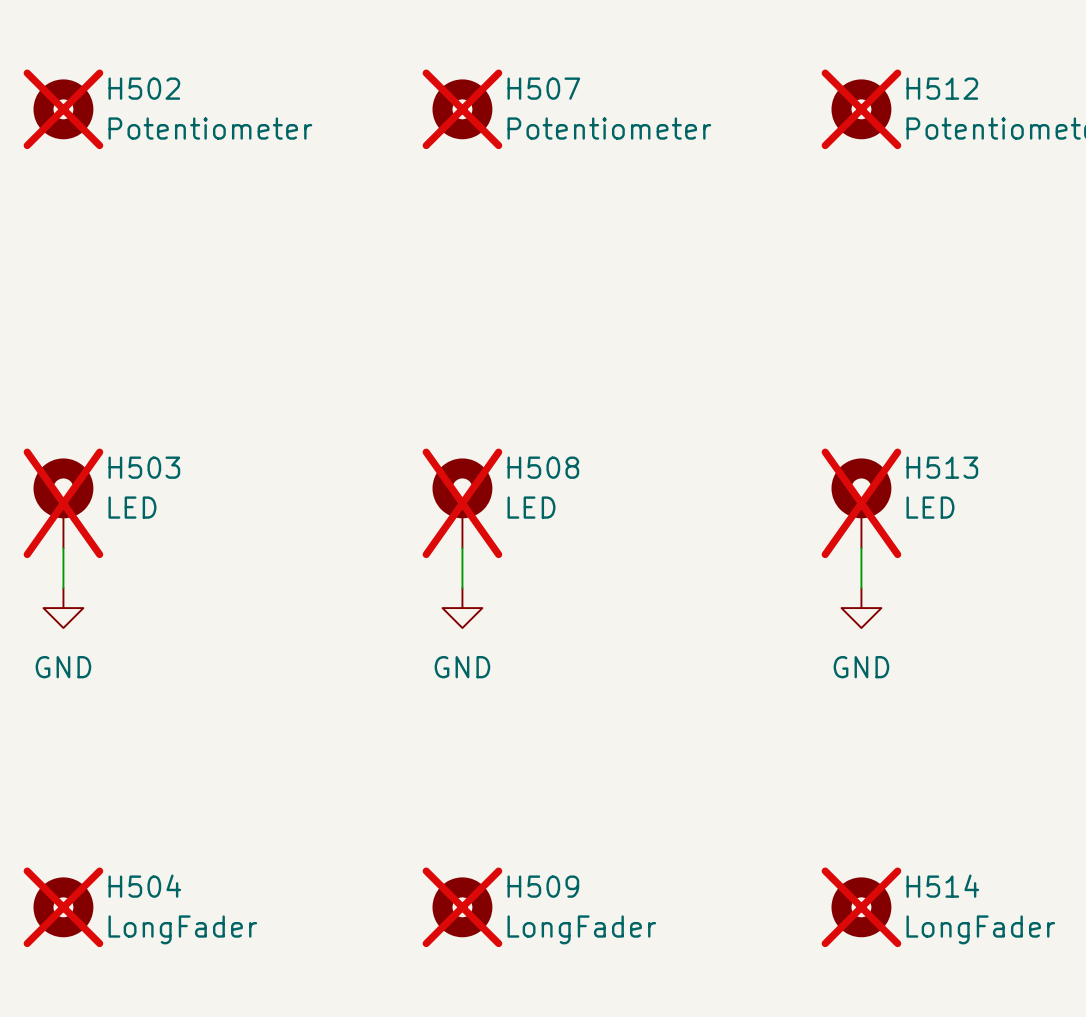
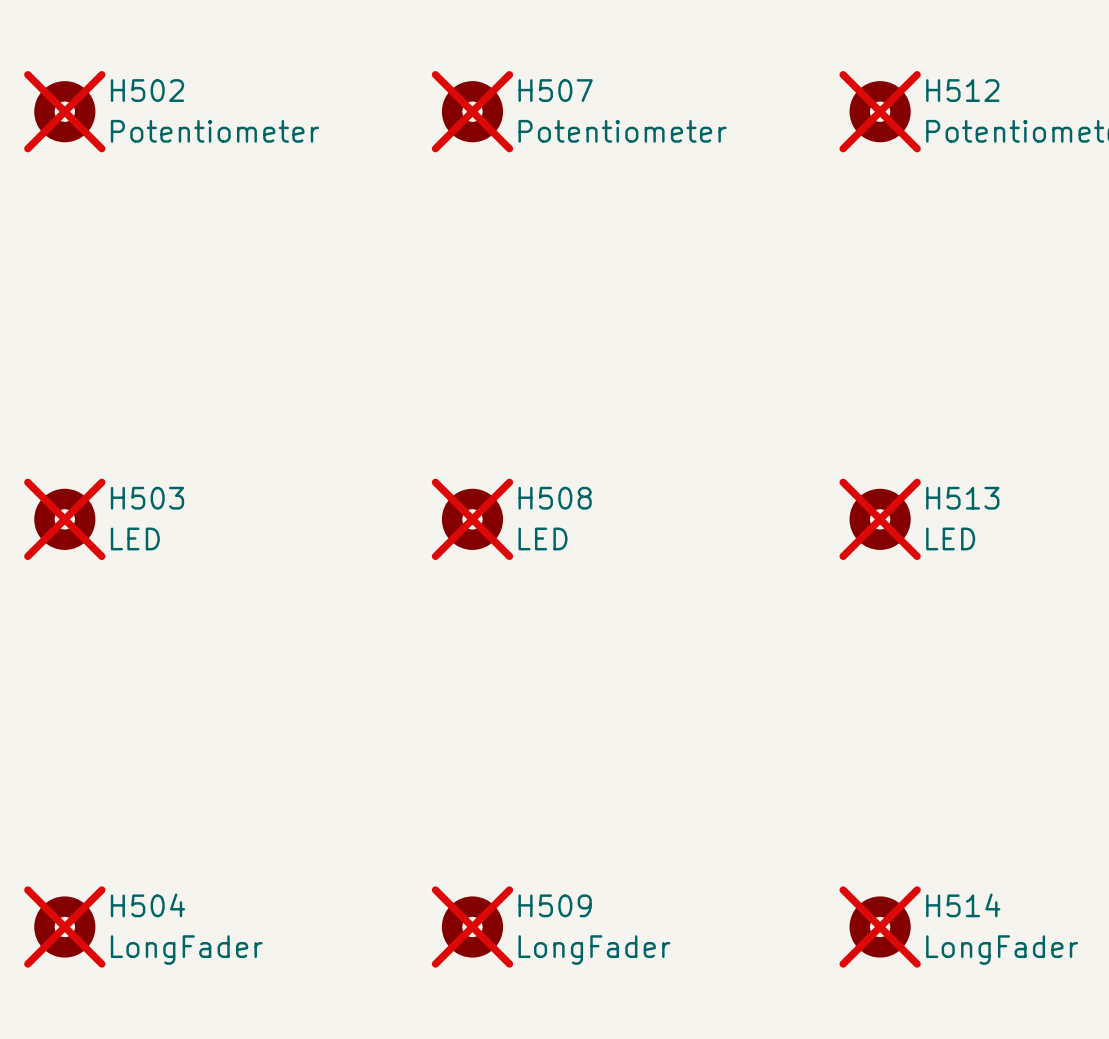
H503 symbol: [33, 458, 94, 549] -> [34, 488, 96, 550]
H508 symbol: [432, 458, 493, 549] -> [441, 488, 504, 550]
H513 symbol: [831, 458, 892, 549] -> [849, 488, 911, 550]
wire: (63, 548) (63, 588) -> none
wire: (462, 548) (462, 588) -> none
wire: (861, 548) (861, 588) -> none
power symbol: GND (63, 608) -> none
power symbol: GND (462, 608) -> none
power symbol: GND (861, 608) -> none

